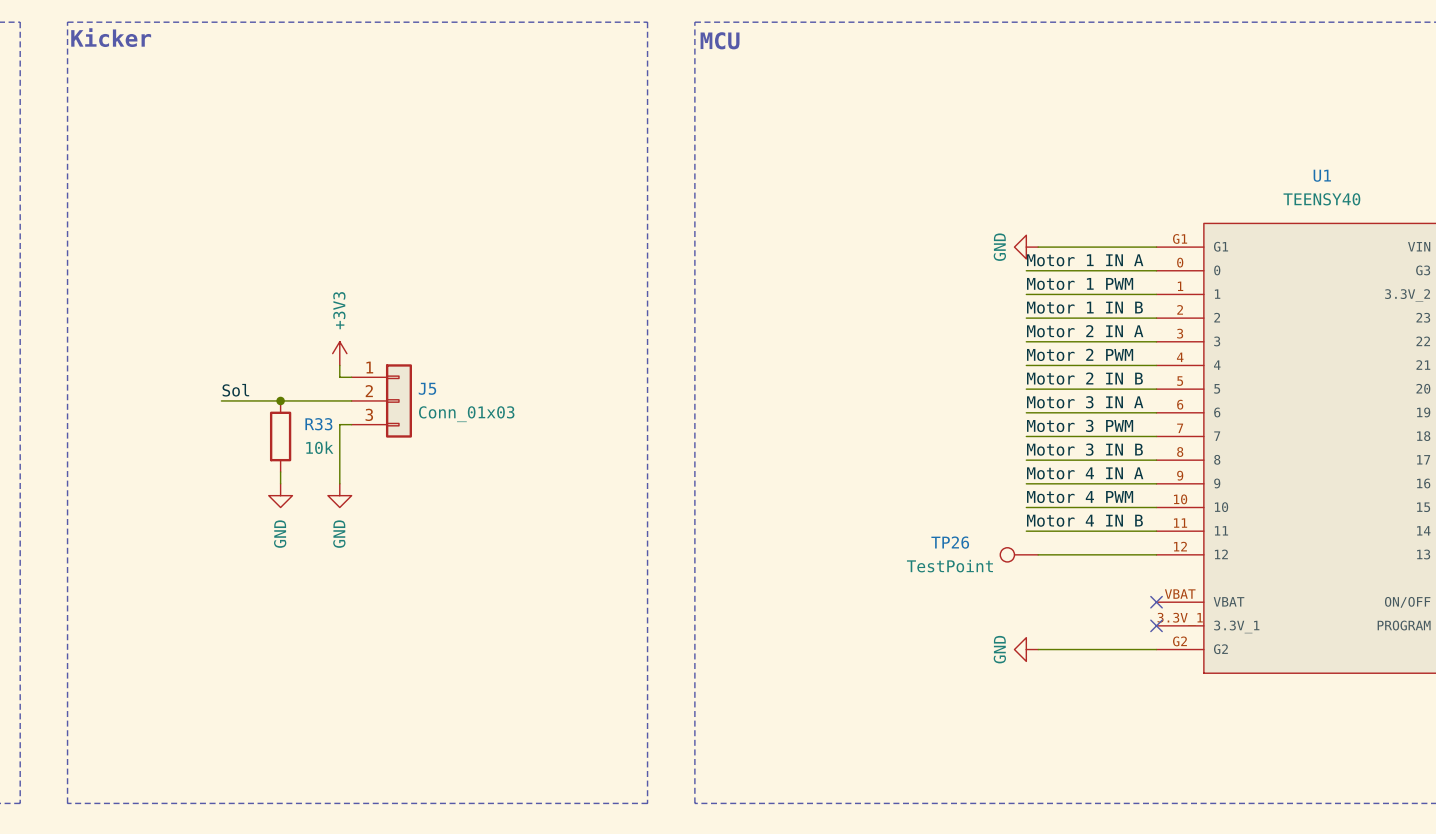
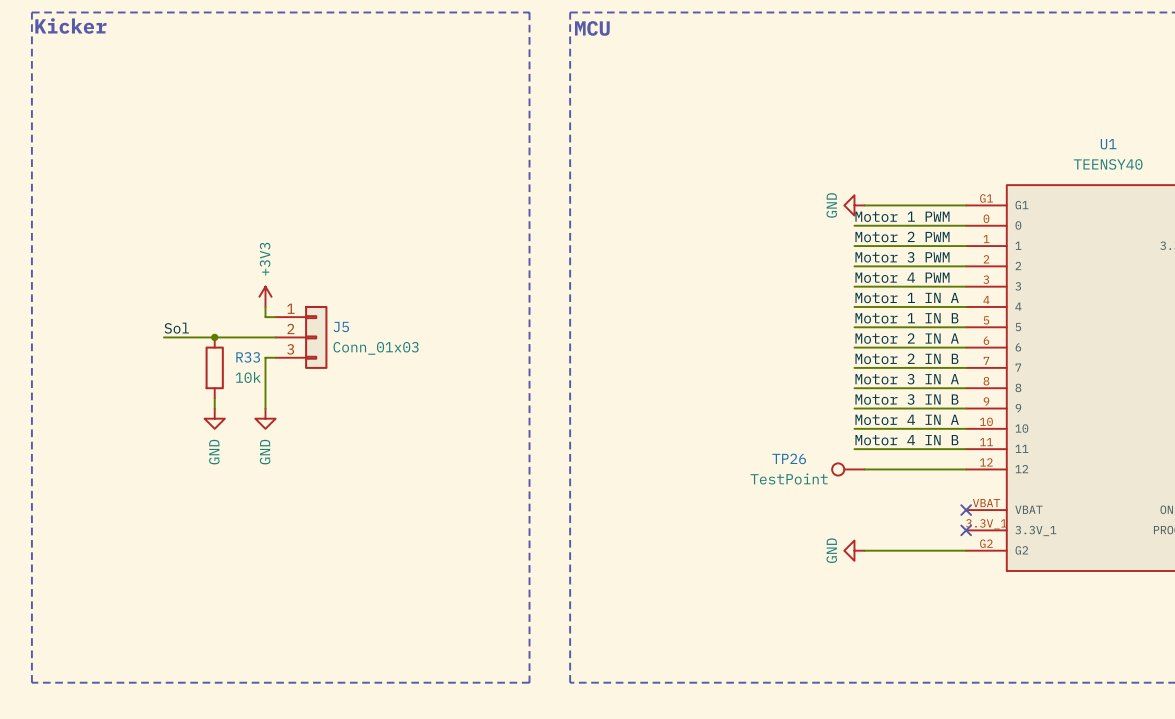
label: Motor 1 IN A (1085, 260) -> Motor 1 PWM (902, 216)
label: Motor 1 PWM (1080, 283) -> Motor 2 PWM (902, 236)
label: Motor 1 IN B (1084, 307) -> Motor 3 PWM (902, 257)
label: Motor 2 IN A (1085, 331) -> Motor 4 PWM (902, 277)
label: Motor 2 PWM (1080, 354) -> Motor 1 IN A (907, 298)
label: Motor 2 IN B (1084, 378) -> Motor 1 IN B (906, 318)
label: Motor 3 IN A (1085, 402) -> Motor 2 IN A (907, 338)
label: Motor 3 PWM (1080, 425) -> Motor 2 IN B (906, 358)
label: Motor 3 IN B (1084, 449) -> Motor 3 IN A (907, 379)
label: Motor 4 IN A (1085, 473) -> Motor 3 IN B (906, 399)
label: Motor 4 PWM (1080, 497) -> Motor 4 IN A (907, 419)

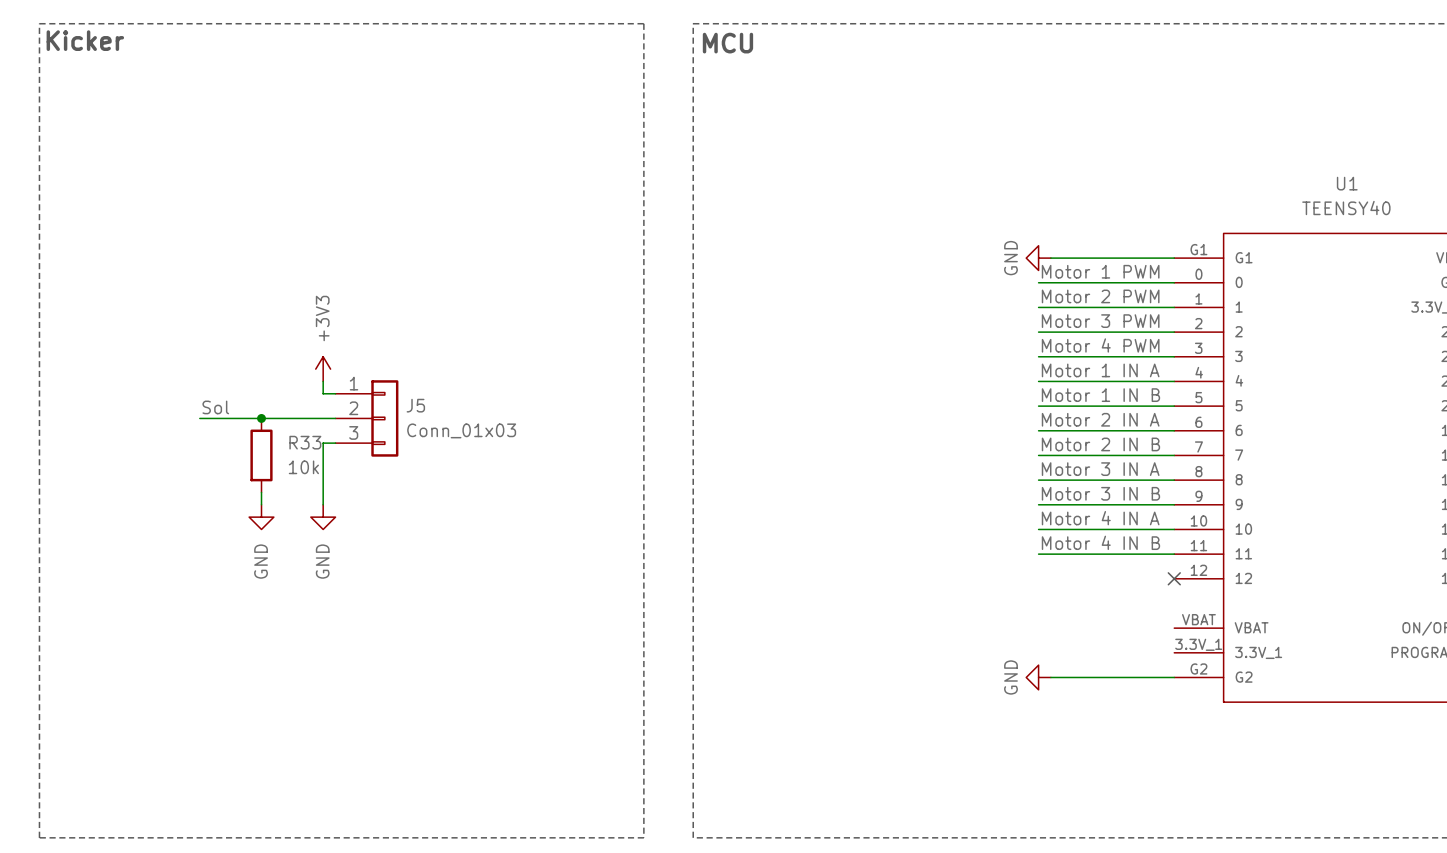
TP26: TestPoint (848, 469) -> none
wire: (864, 469) (966, 469) -> none
no-connect mark: none -> (1174, 578)
no-connect mark: (966, 510) -> none
no-connect mark: (966, 530) -> none

